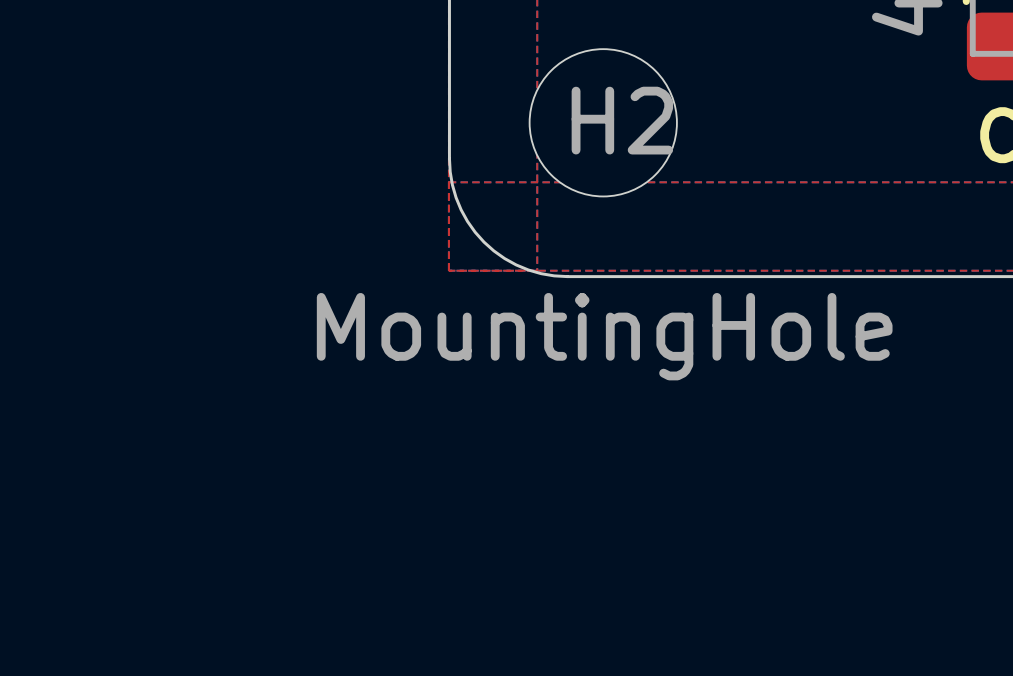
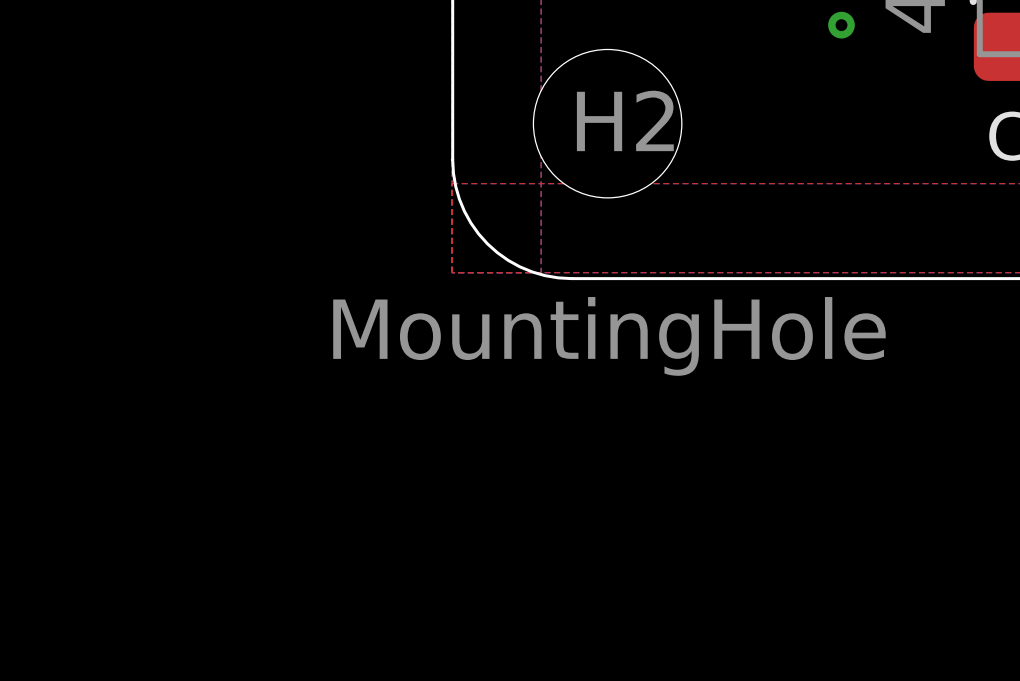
via: none -> (841, 25)

